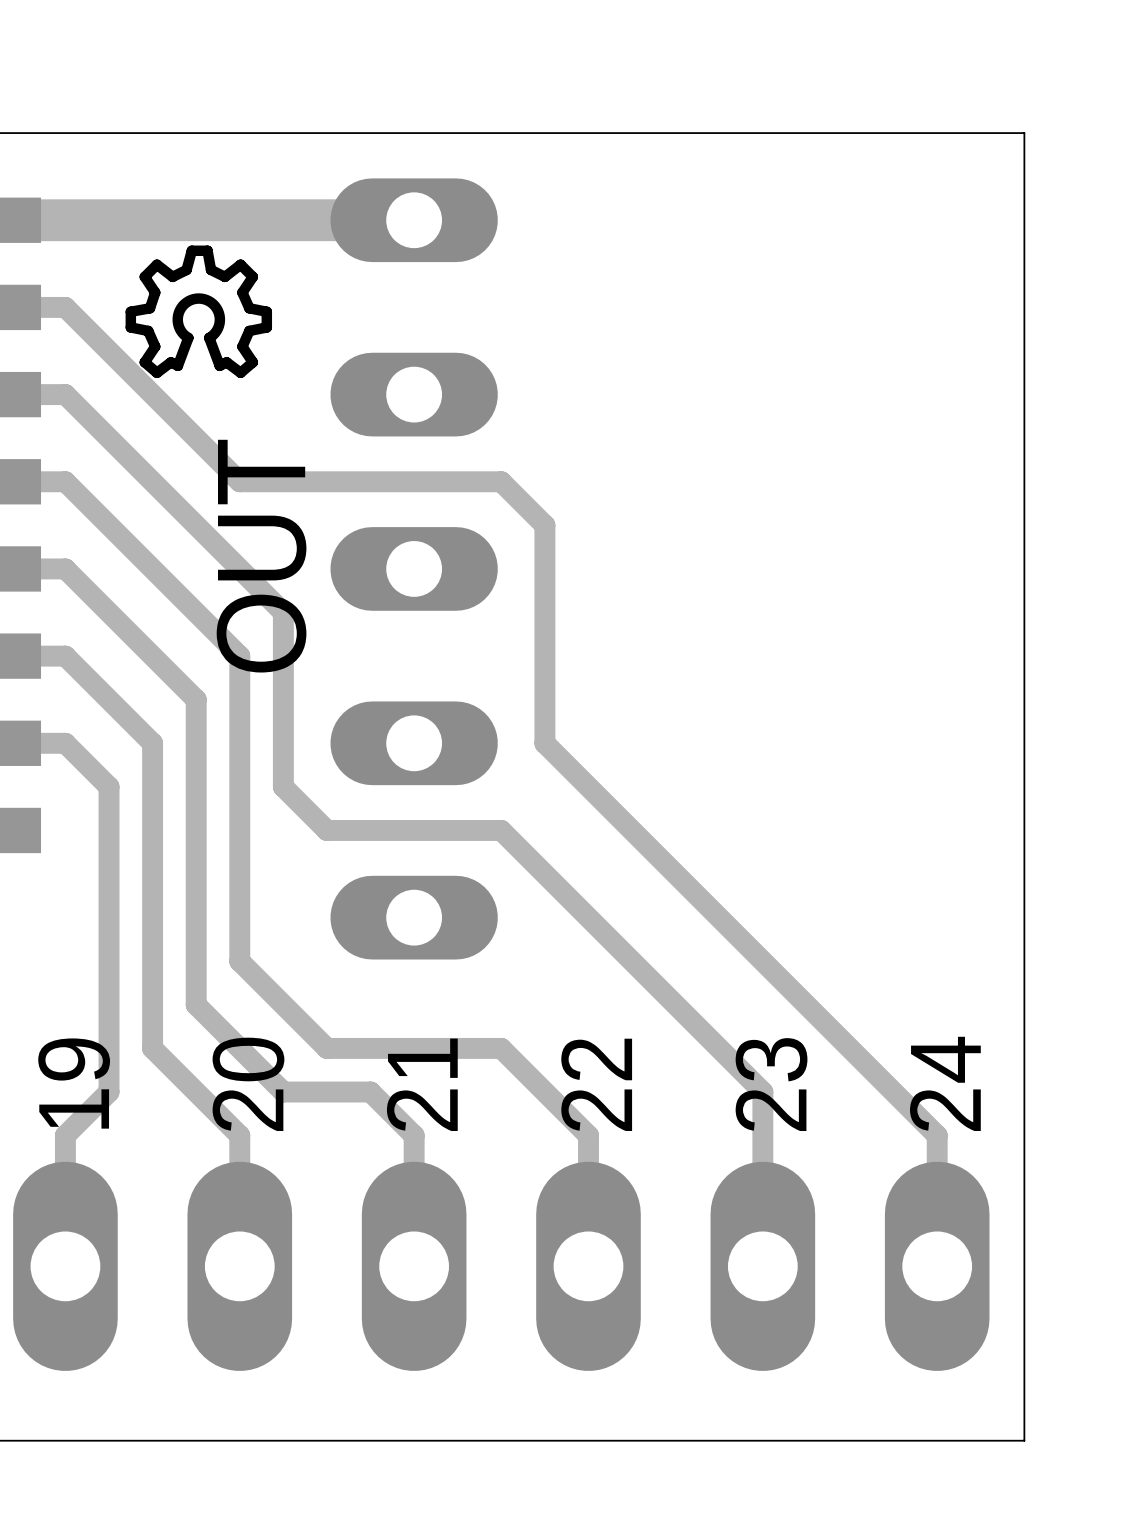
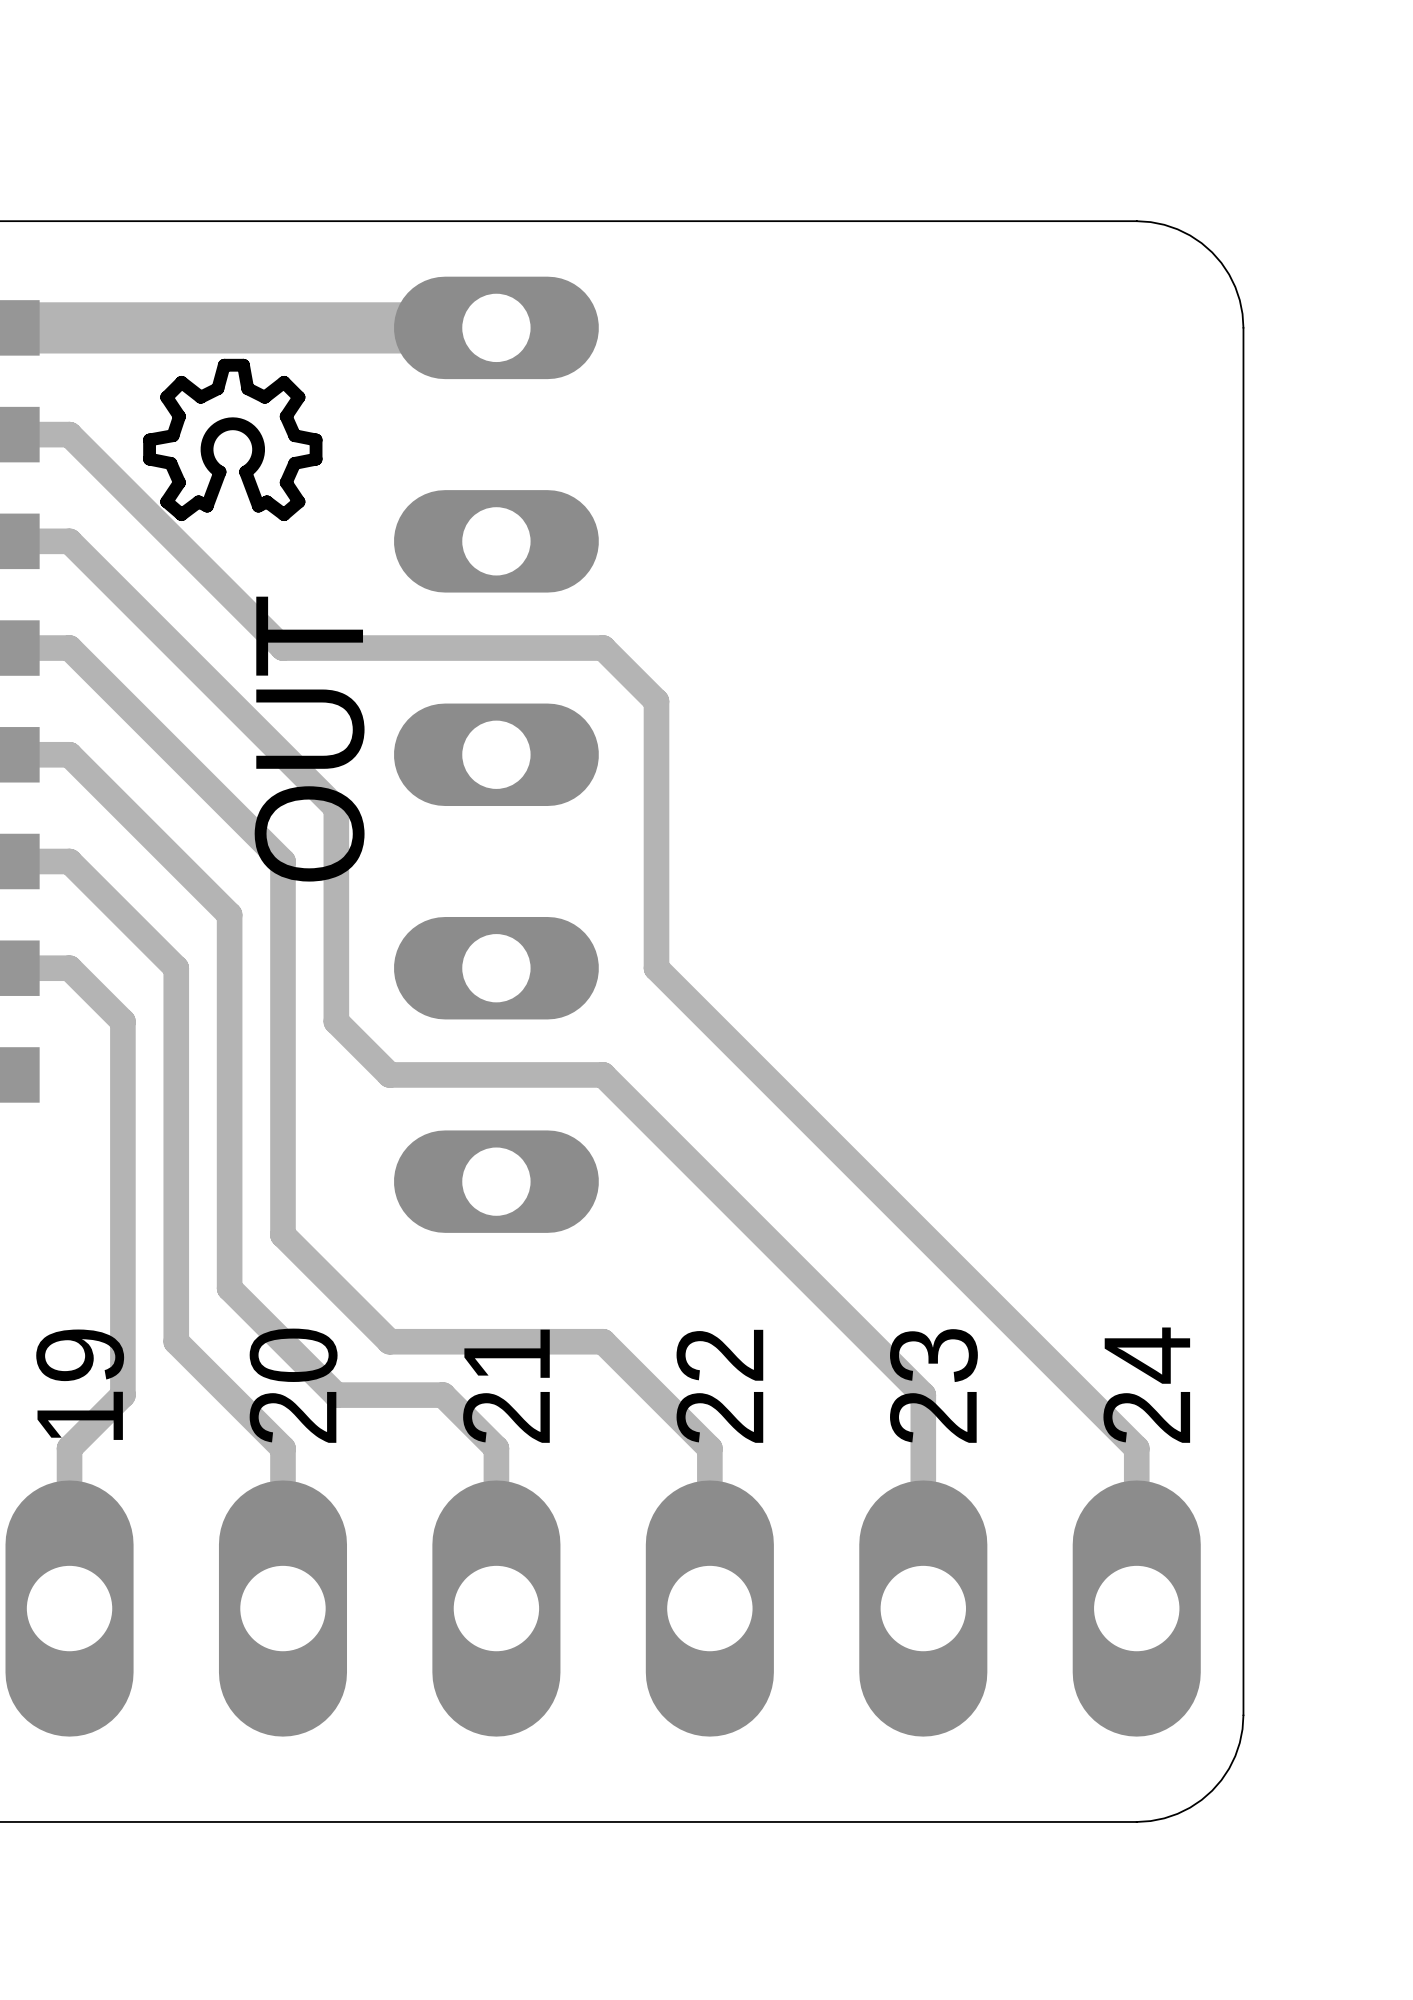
board edge: (937, 133) (1024, 133) (1024, 220) -> (1136, 221) (1164, 224) (1177, 229) (1190, 235) (1212, 252) (1229, 274) (1235, 287) (1239, 300) (1243, 327)
board edge: (1024, 1353) (1024, 1440) (937, 1440) -> (1243, 1715) (1239, 1742) (1235, 1756) (1229, 1768) (1212, 1790) (1190, 1807) (1177, 1813) (1164, 1818) (1136, 1821)

